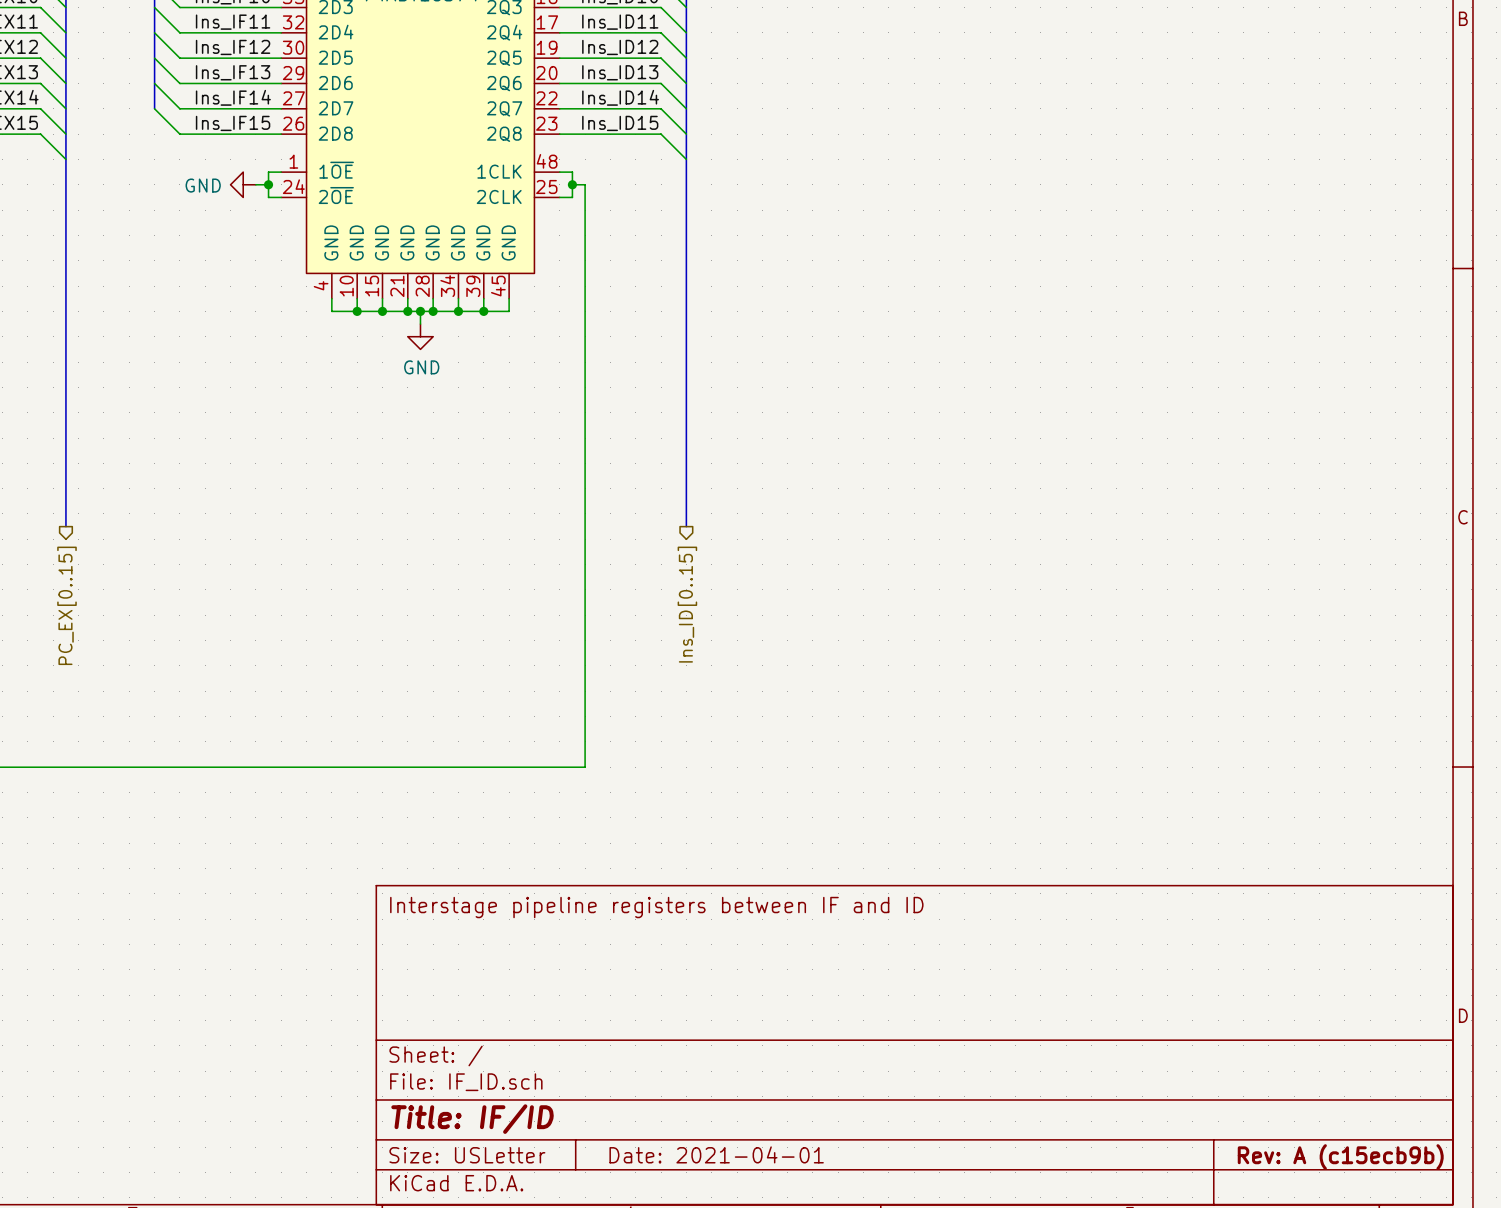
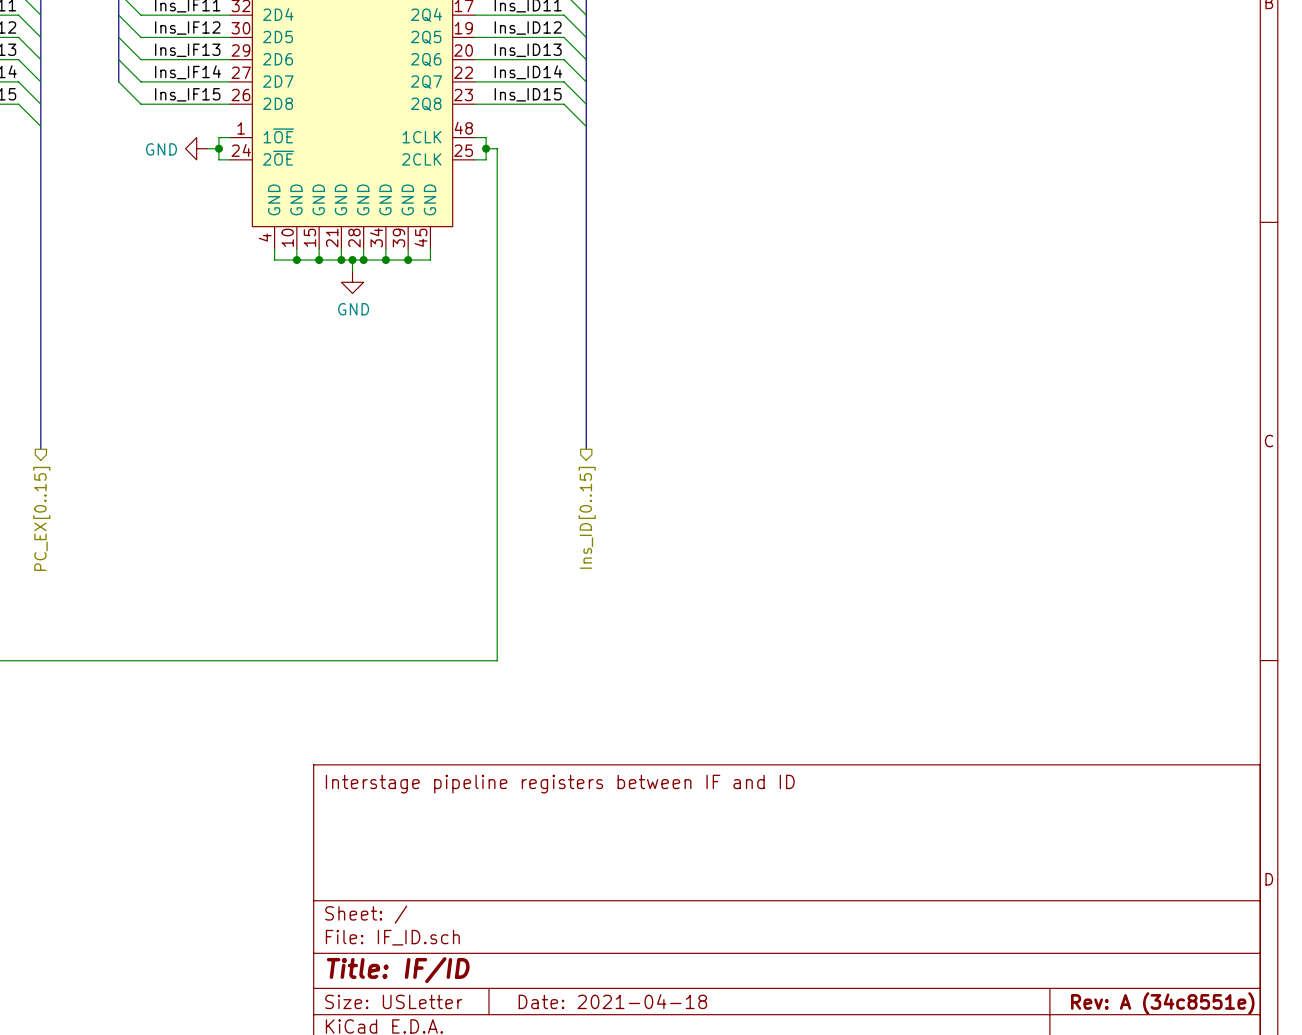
title block: Date: 2021-04-01 (716, 1154) -> Date: 2021-04-18 (612, 1001)
title block: Rev: A (c15ecb9b) (1340, 1157) -> Rev: A (34c8551e) (1162, 1003)

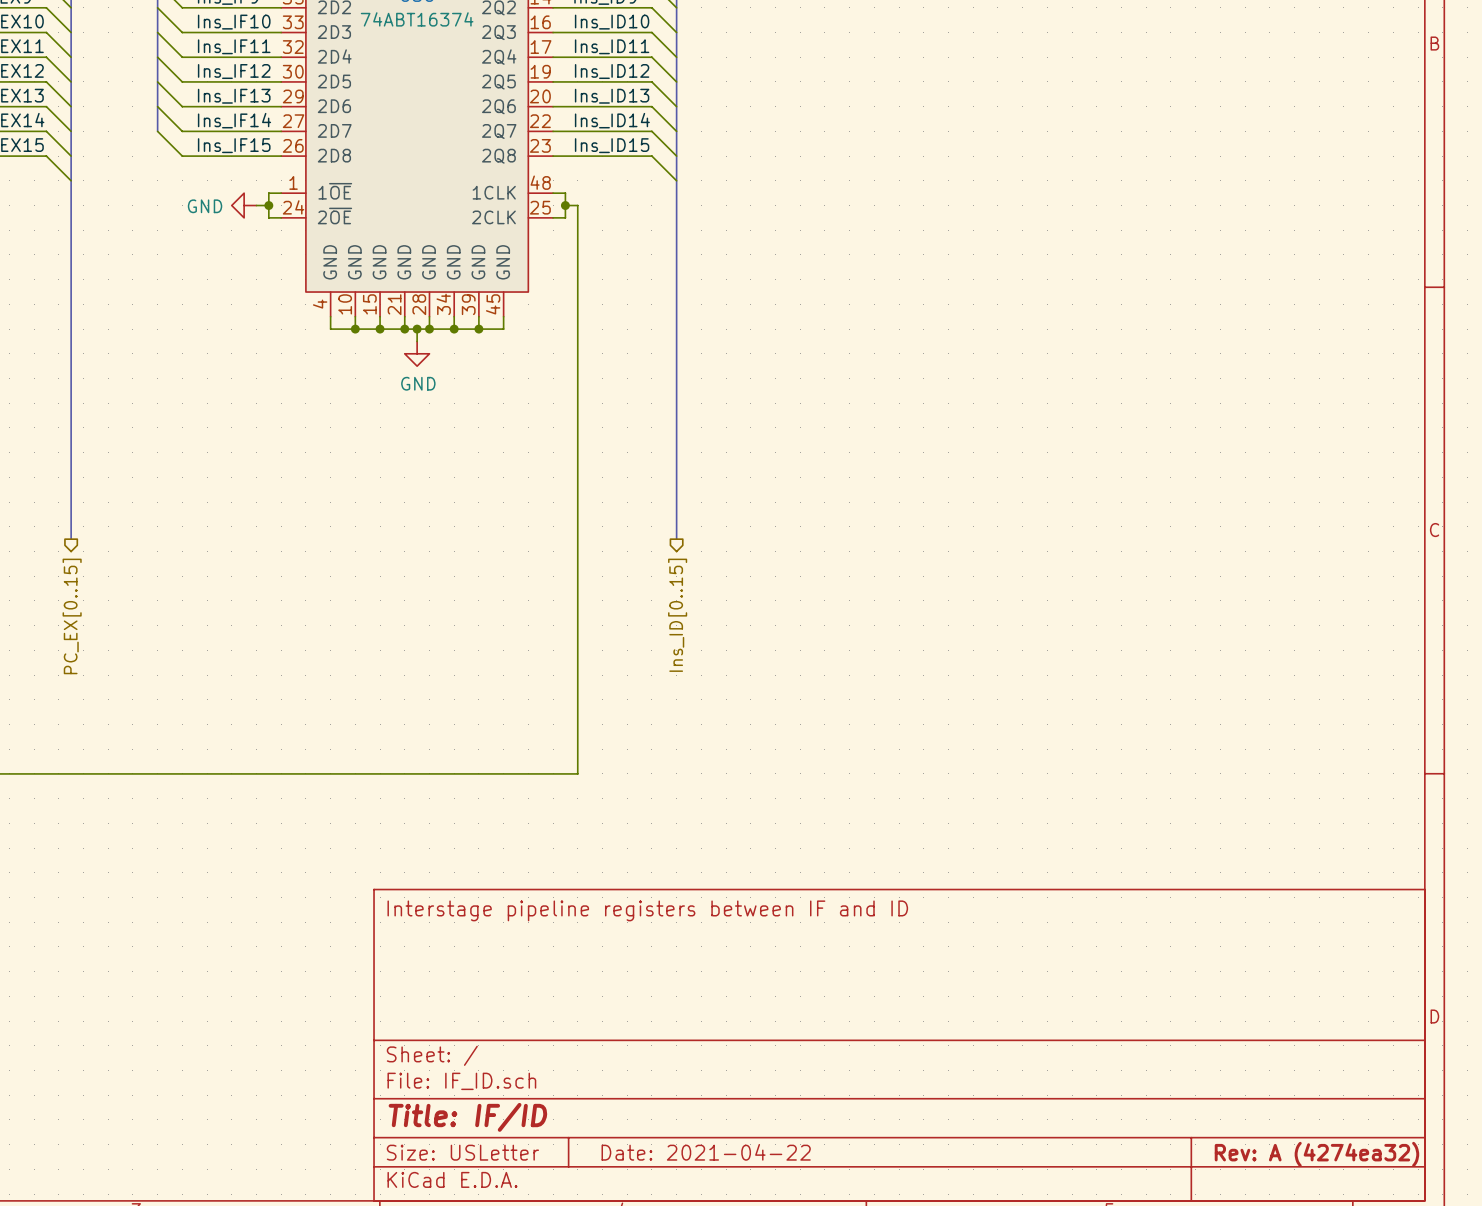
title block: Date: 2021-04-18 (612, 1001) -> Date: 2021-04-22 (706, 1152)
title block: Rev: A (34c8551e) (1162, 1003) -> Rev: A (4274ea32) (1316, 1154)

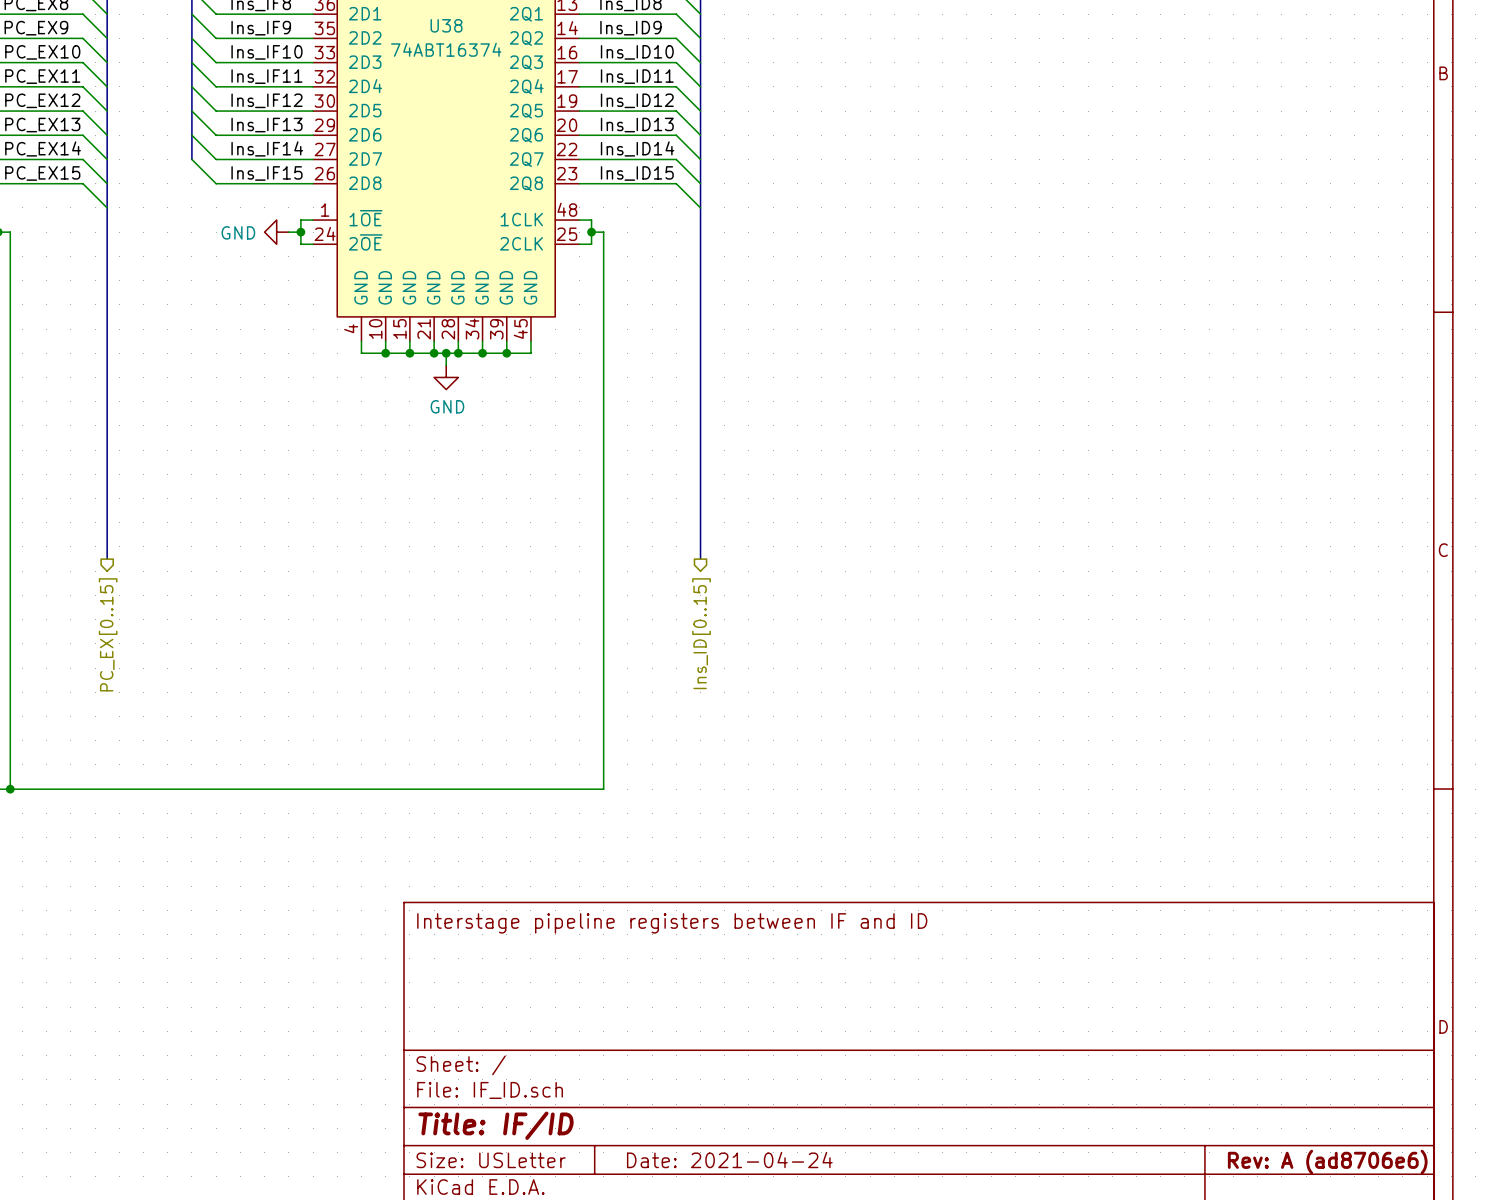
title block: Date: 2021-04-22 (706, 1152) -> Date: 2021-04-24 (729, 1160)
title block: Rev: A (4274ea32) (1316, 1154) -> Rev: A (ad8706e6) (1327, 1162)

